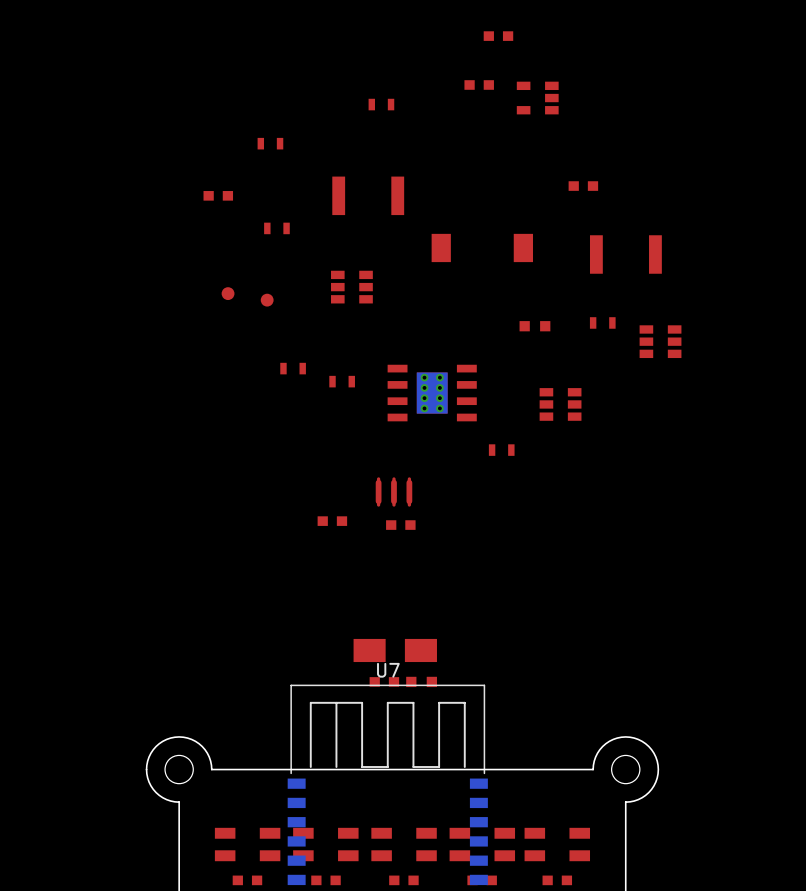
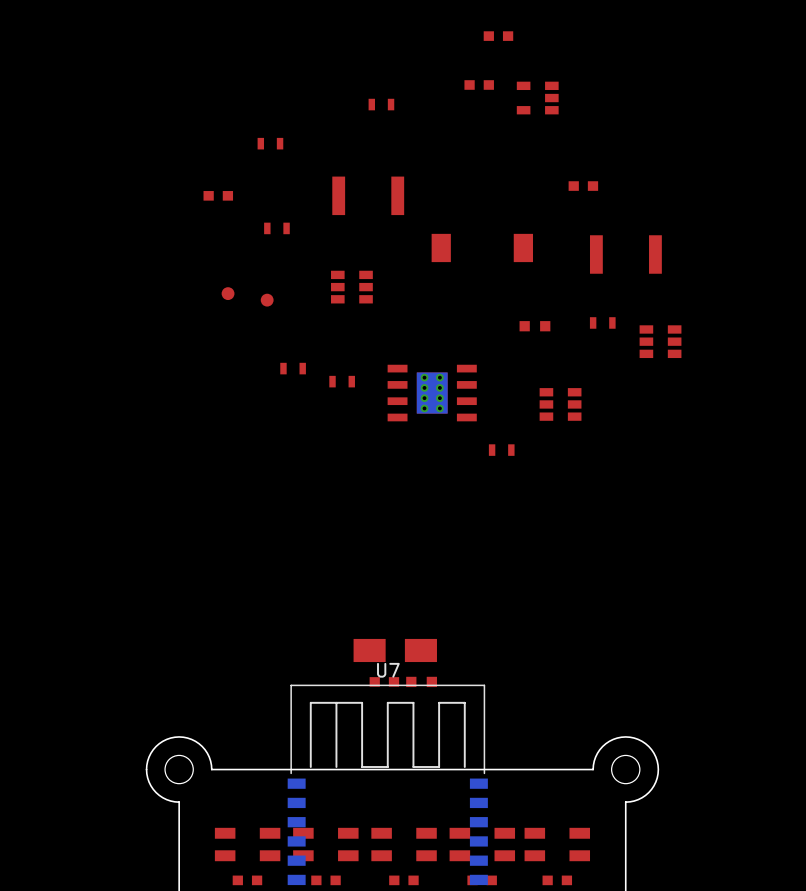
part: (393, 491) -> none
part: (332, 521) -> none
part: (400, 525) -> none

